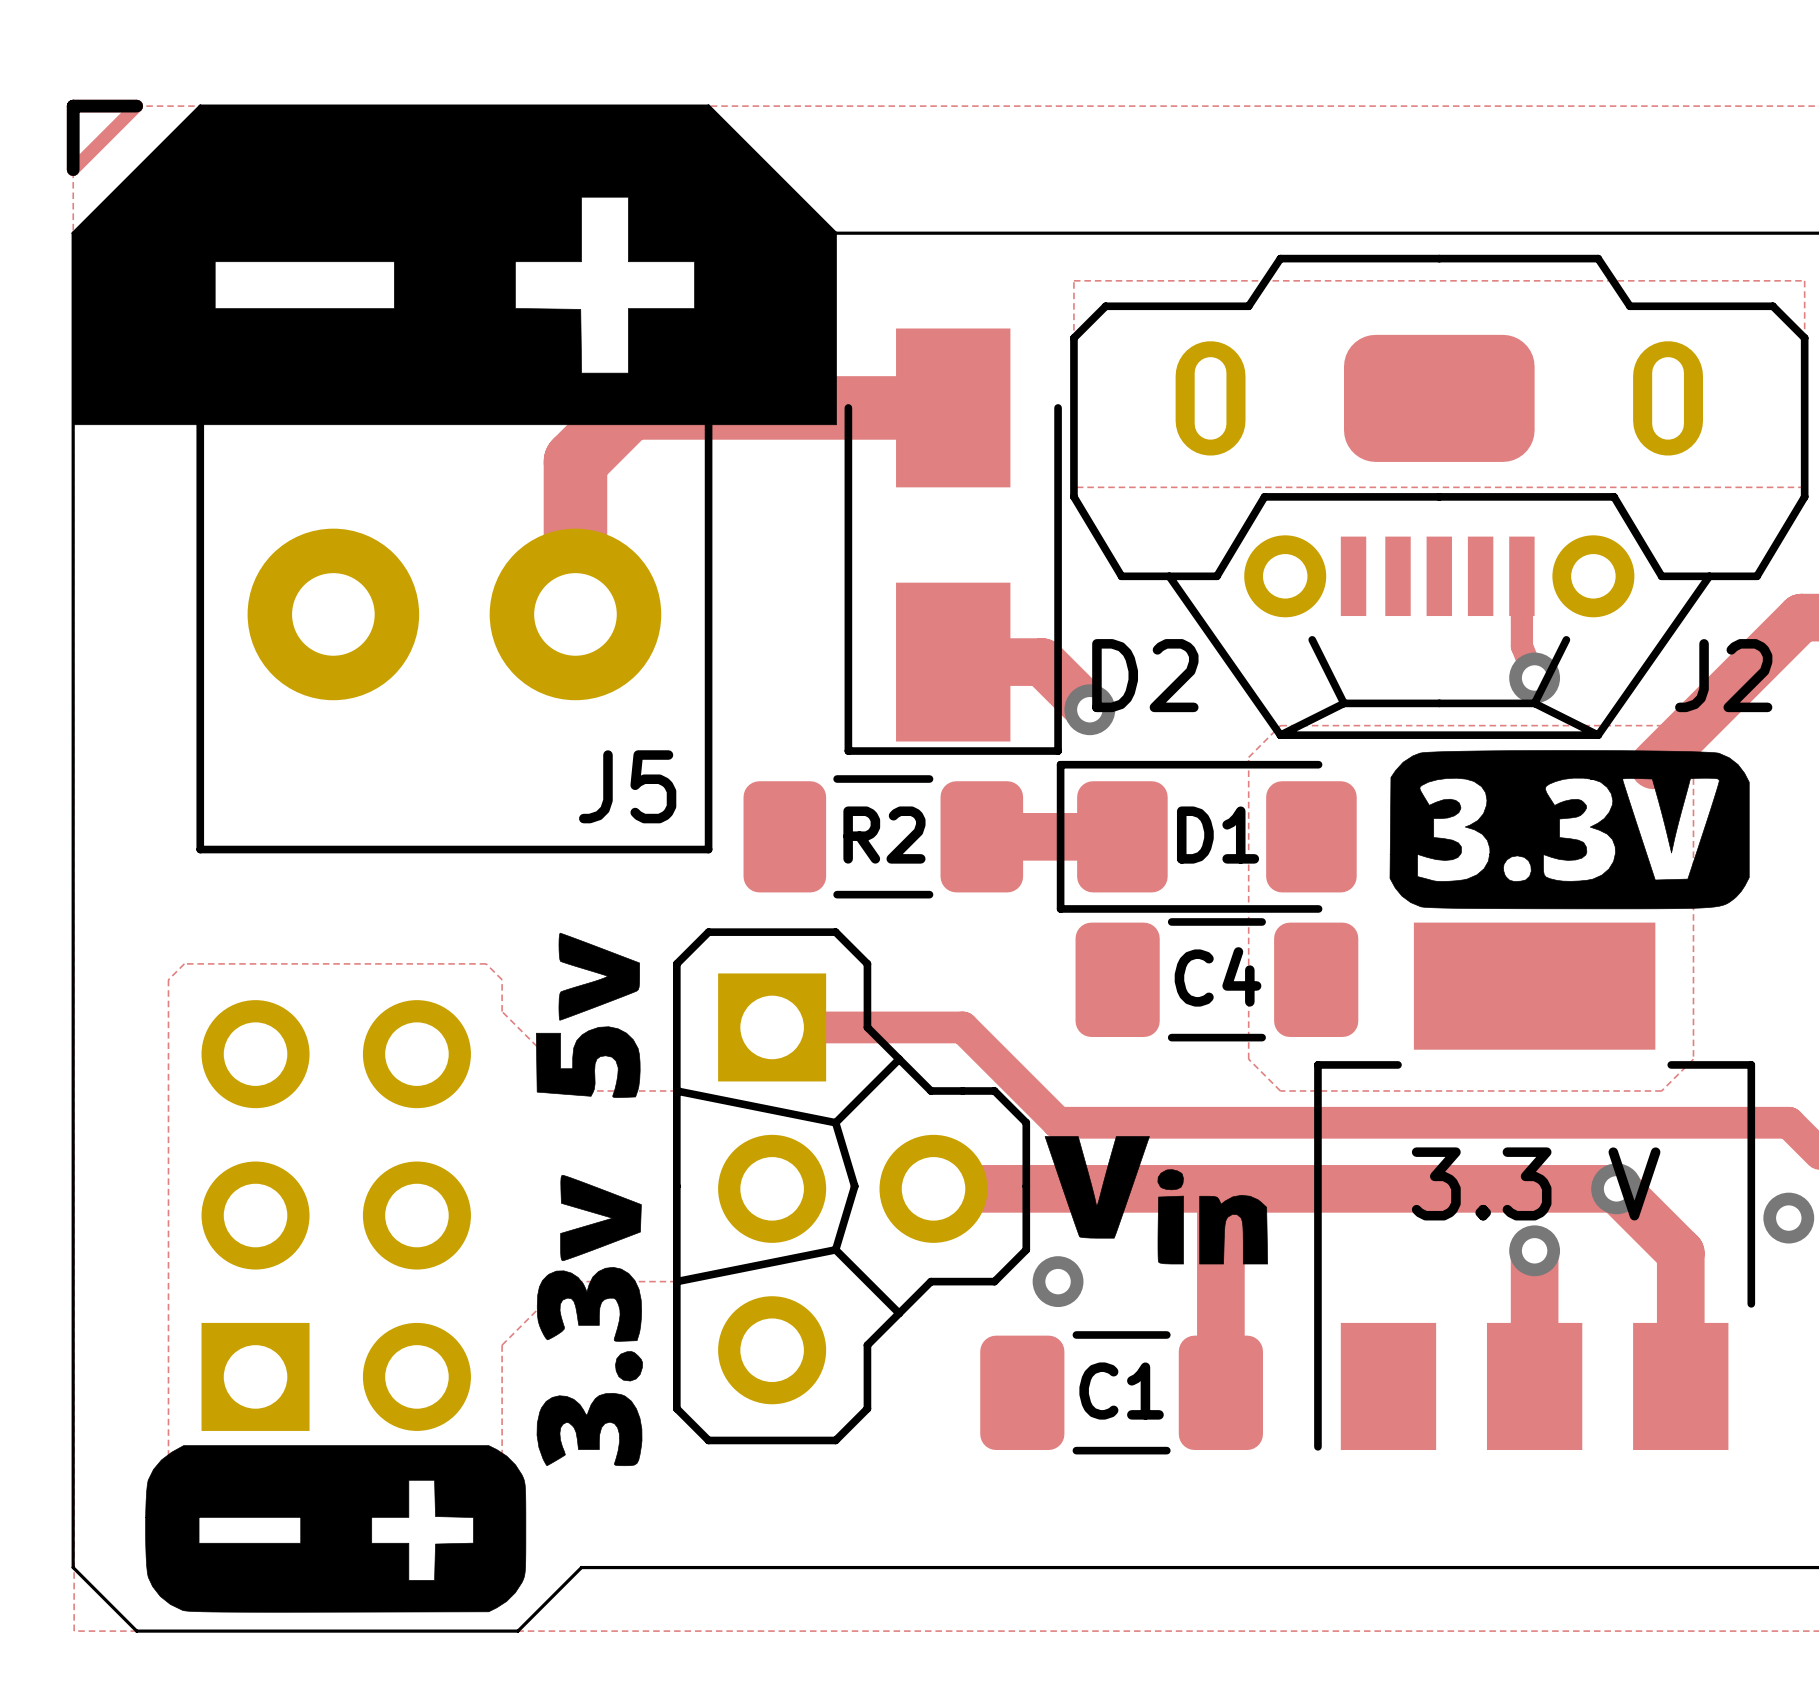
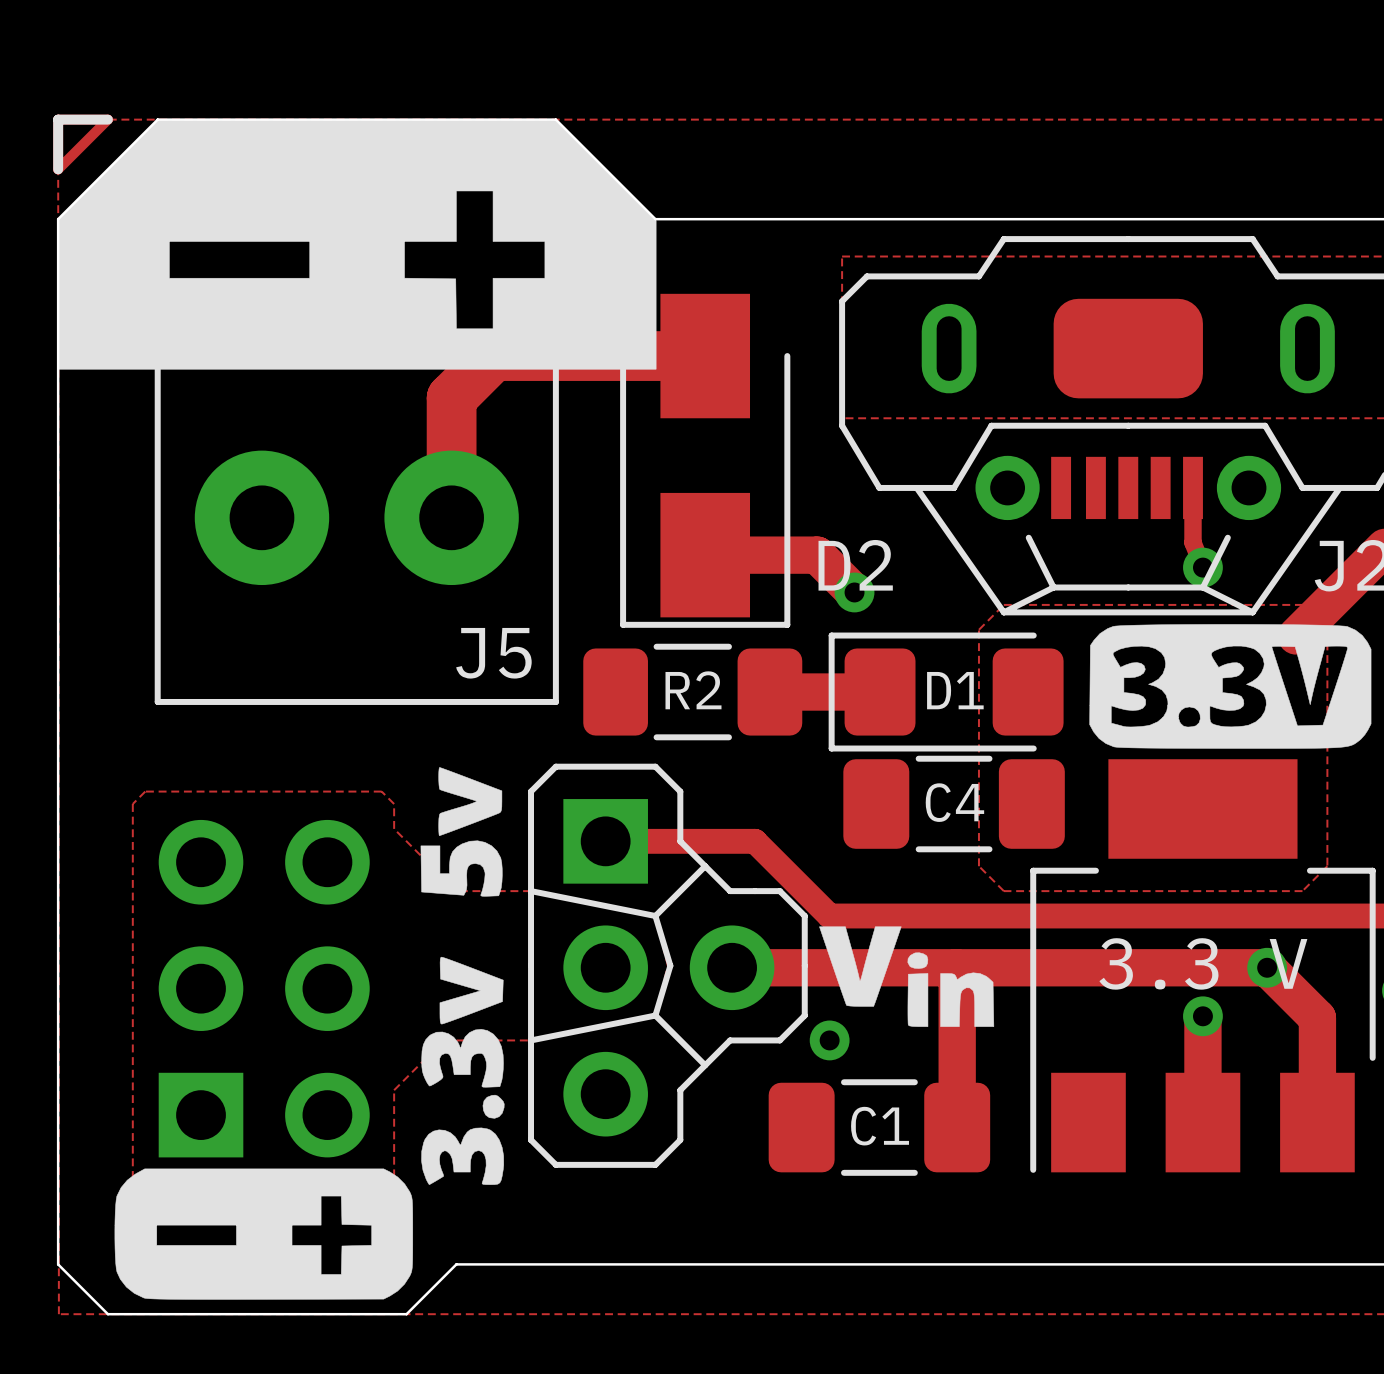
D2 position: (953, 541) -> (705, 460)

